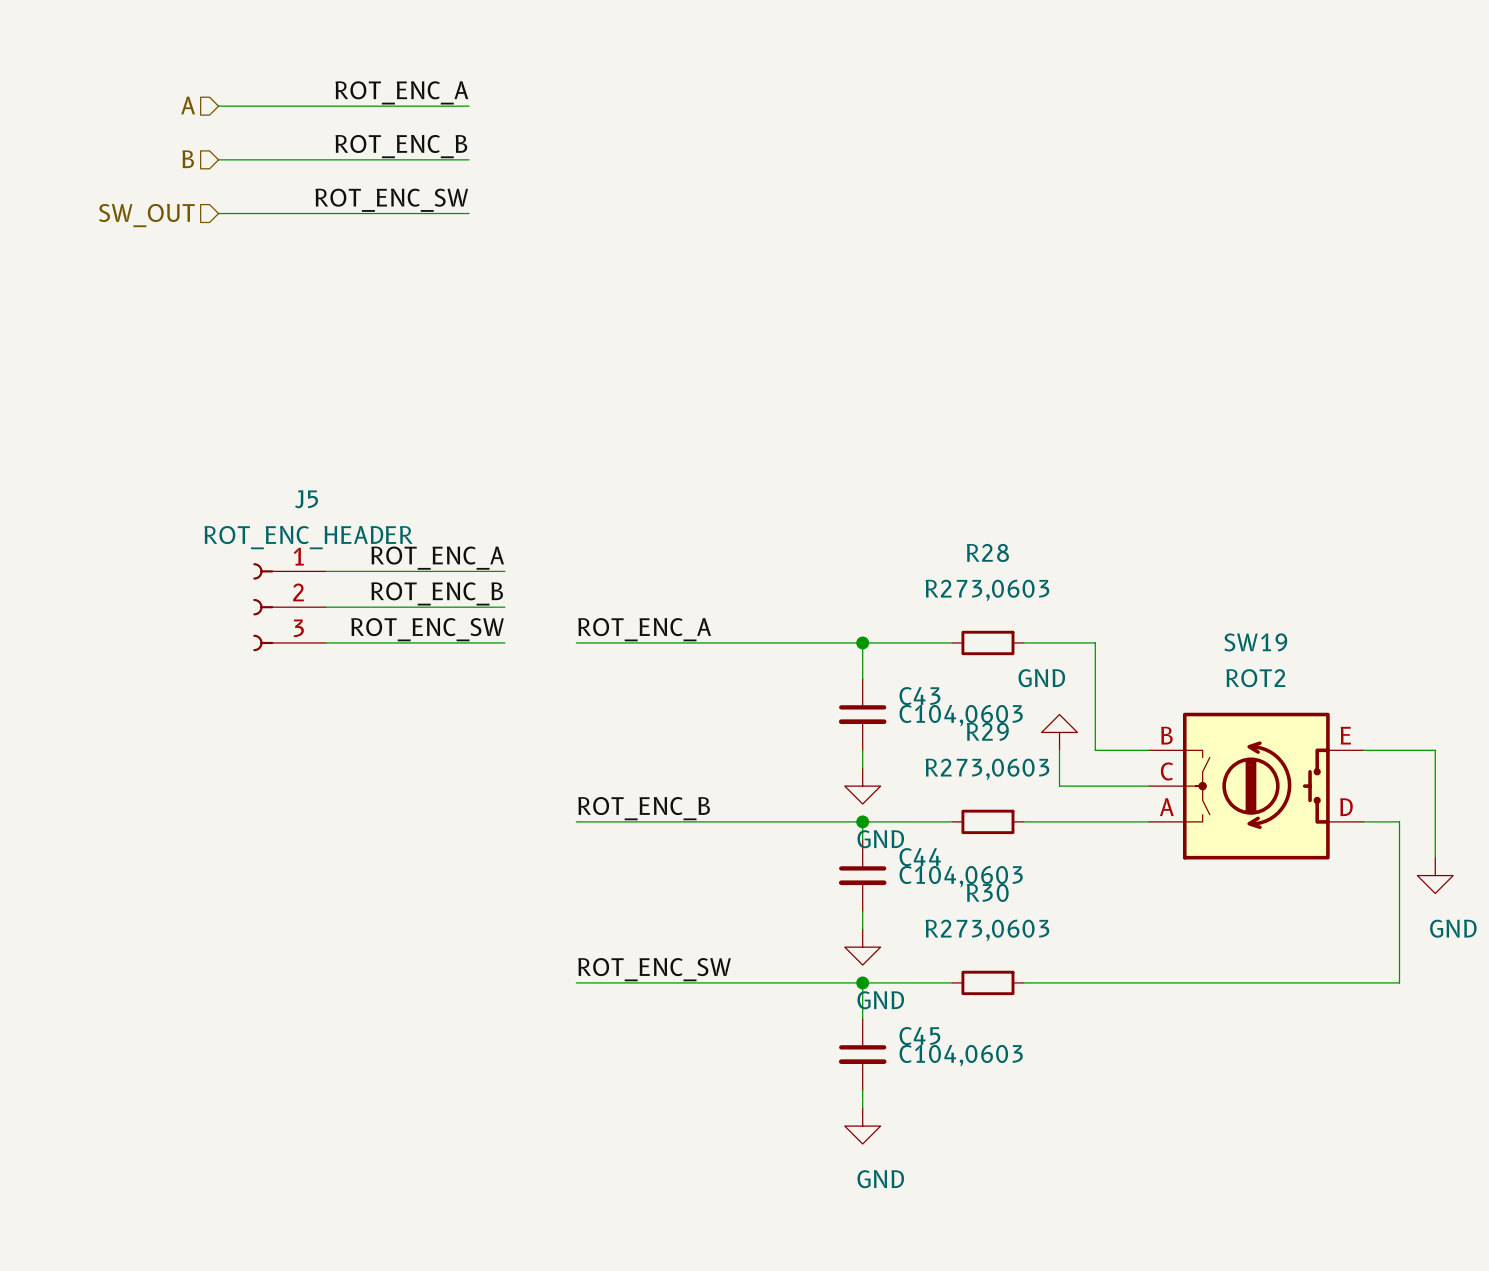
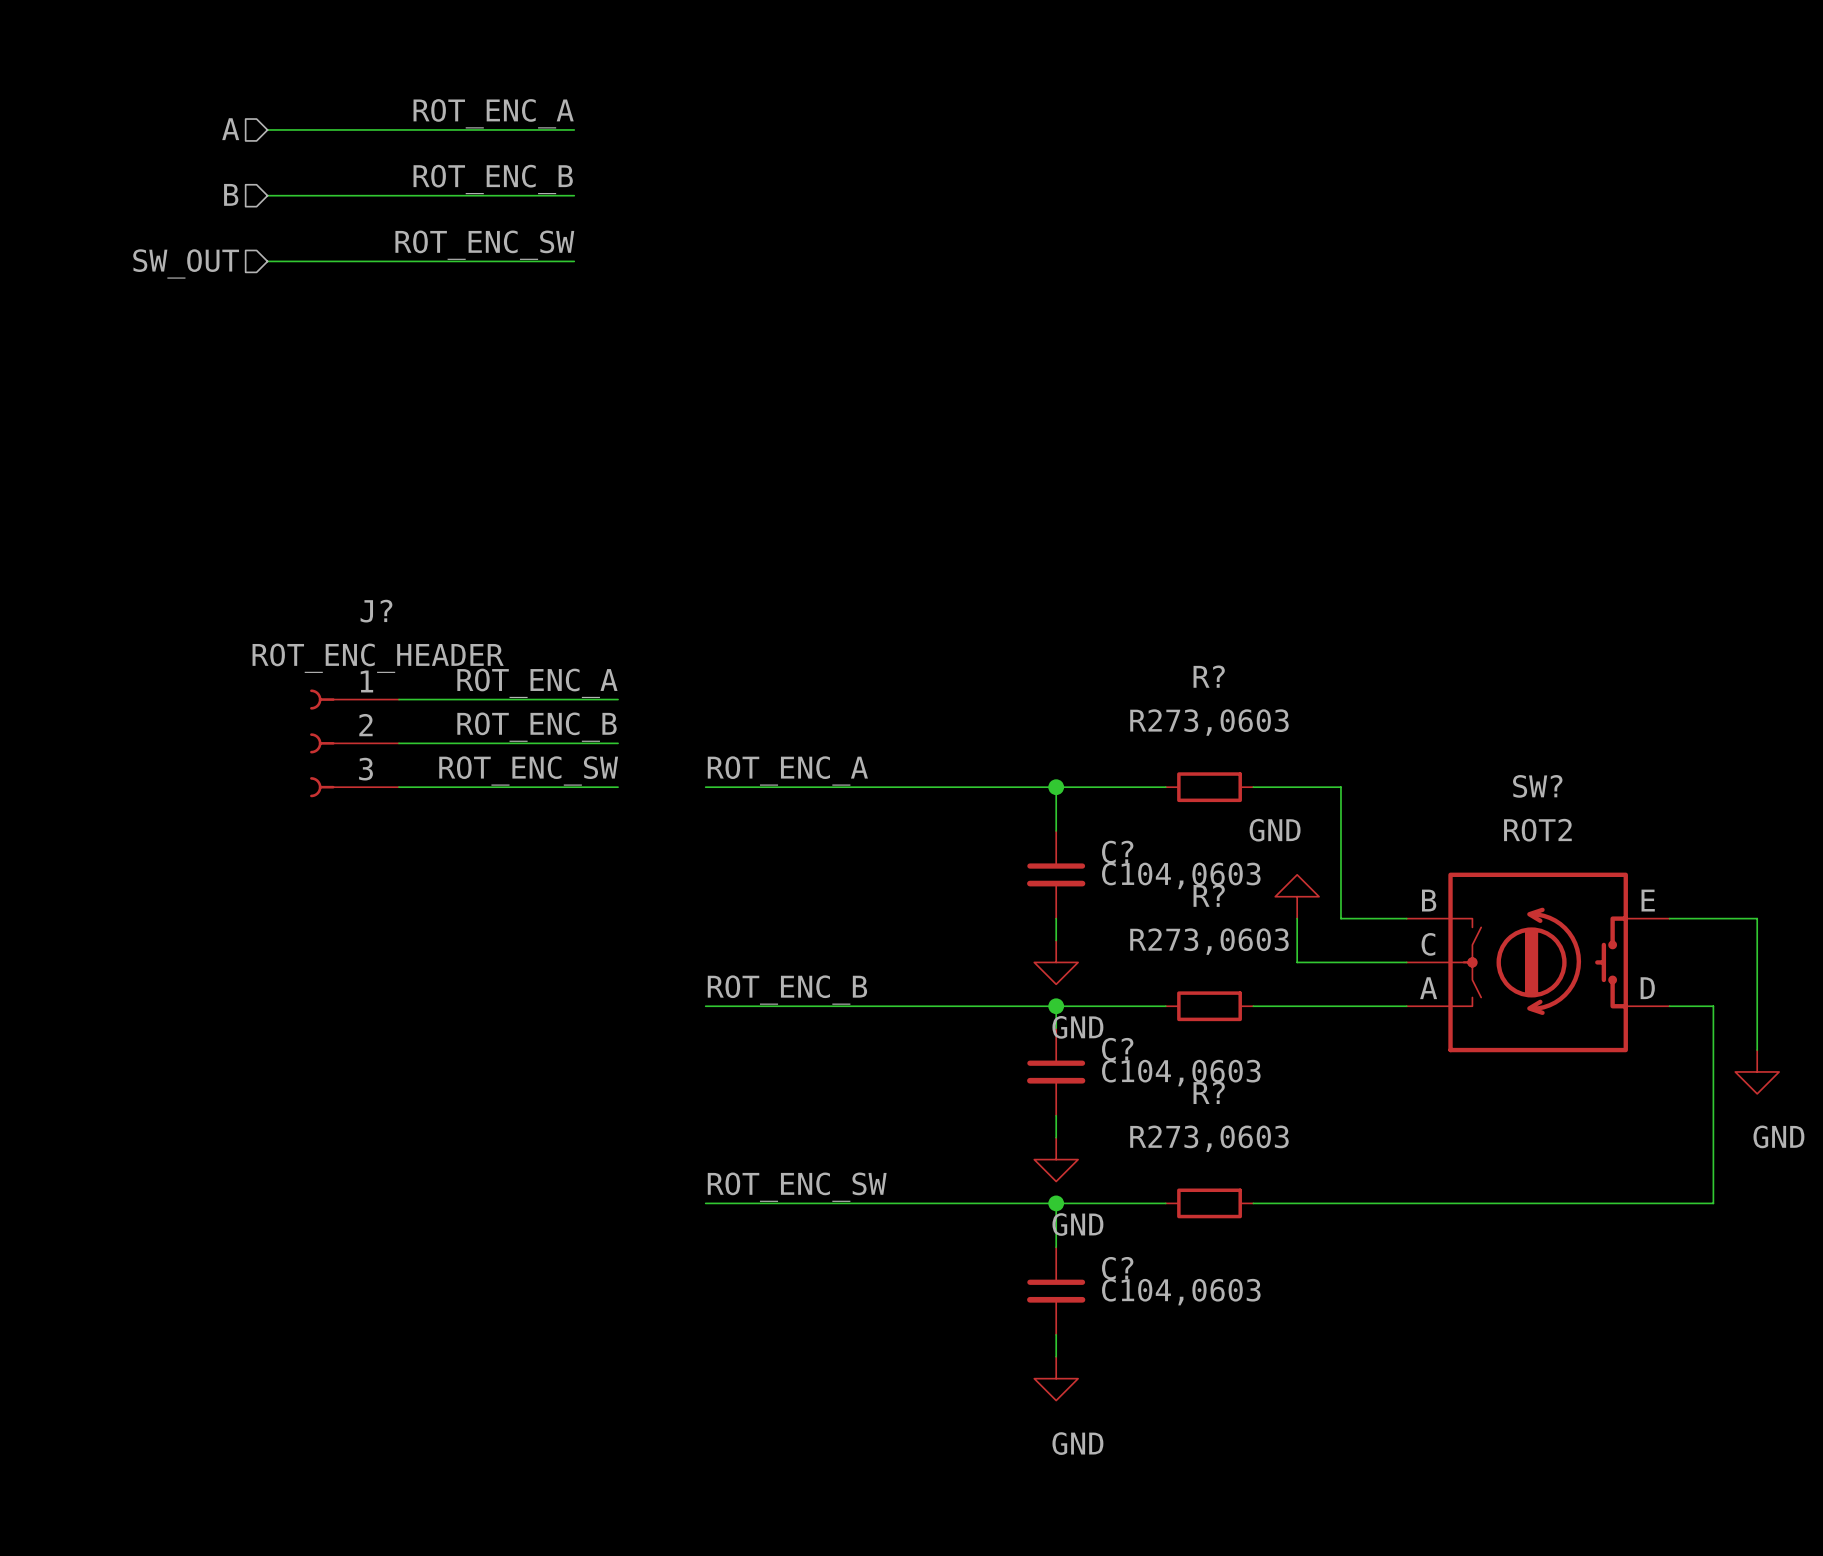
J5 name: J5 (306, 499) -> J? (376, 611)
R28 name: R28 (987, 552) -> R? (1209, 676)
SW19 name: SW19 (1255, 642) -> SW? (1537, 786)
C43 name: C43 (919, 696) -> C? (1117, 852)
R29 name: R29 (987, 731) -> R? (1209, 895)
C44 name: C44 (920, 857) -> C? (1117, 1049)
R30 name: R30 (987, 892) -> R? (1209, 1092)
C45 name: C45 (919, 1036) -> C? (1117, 1268)

